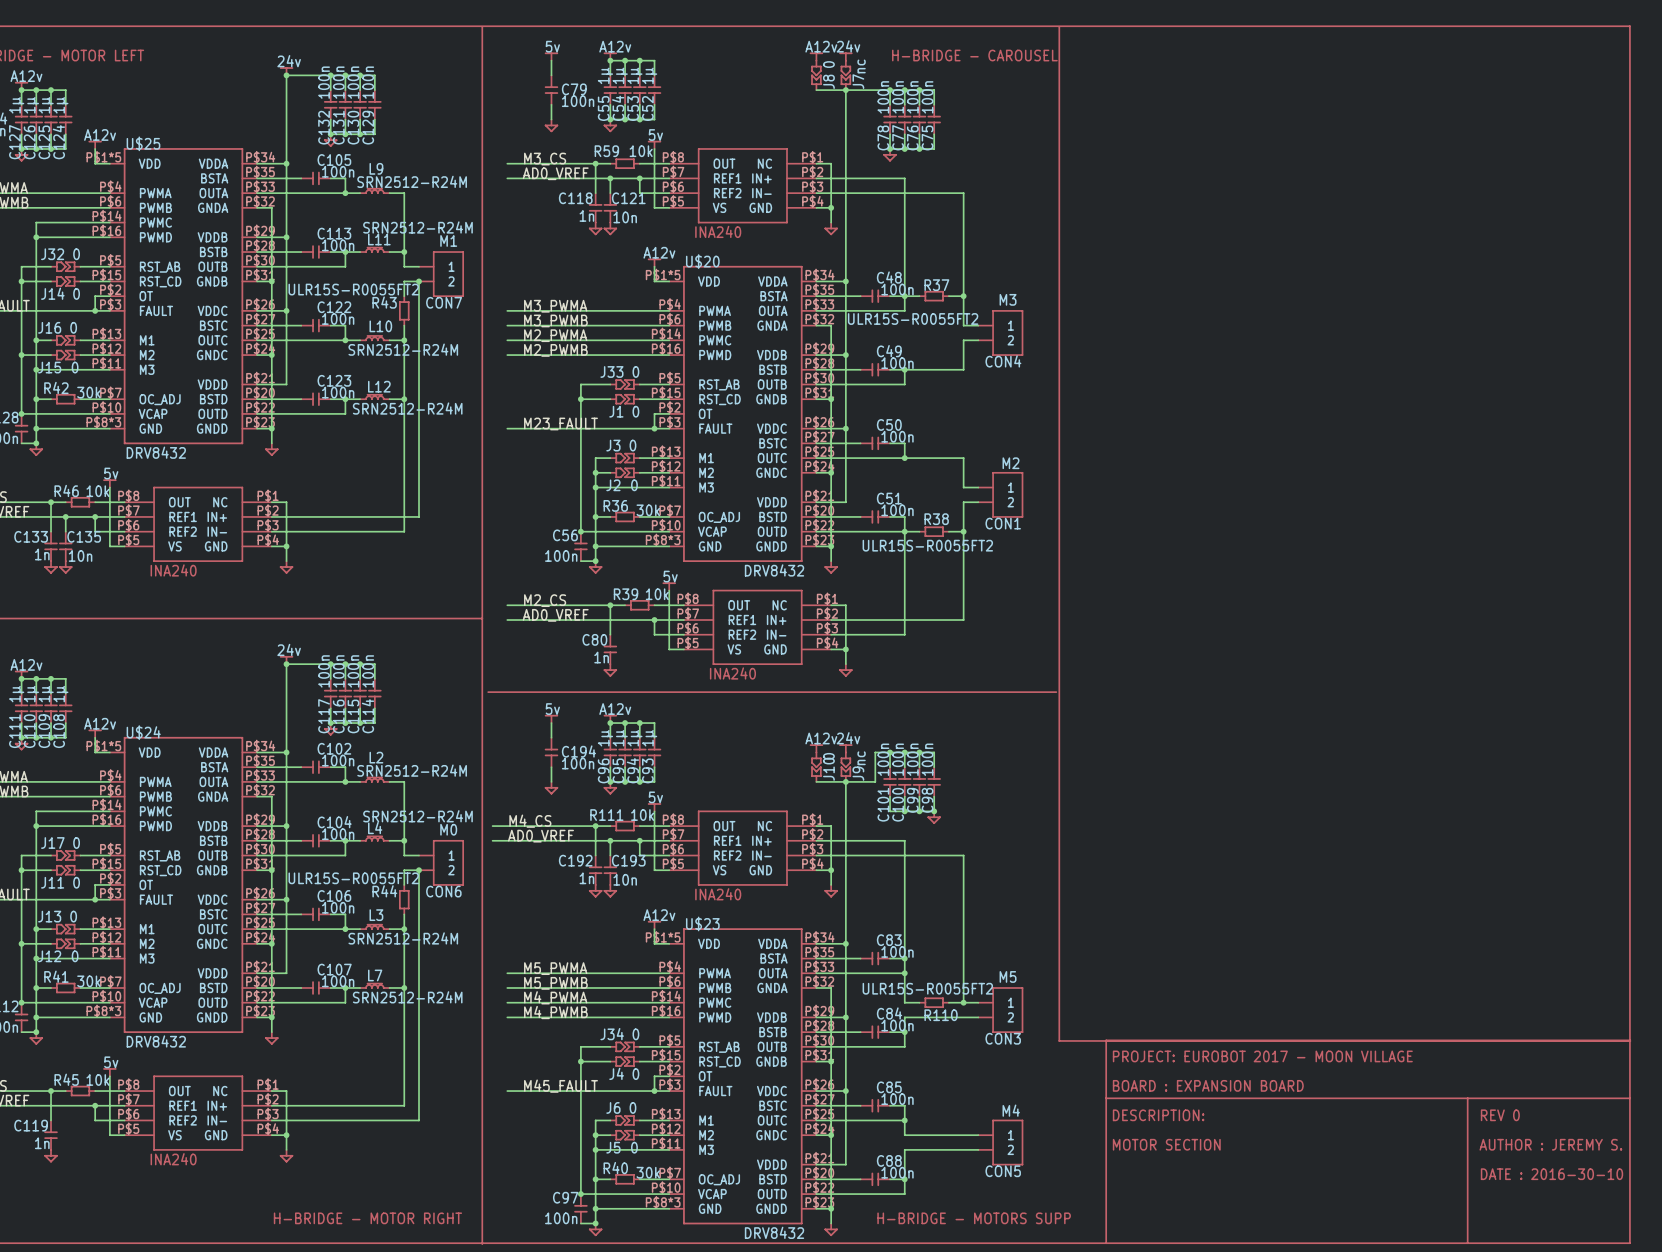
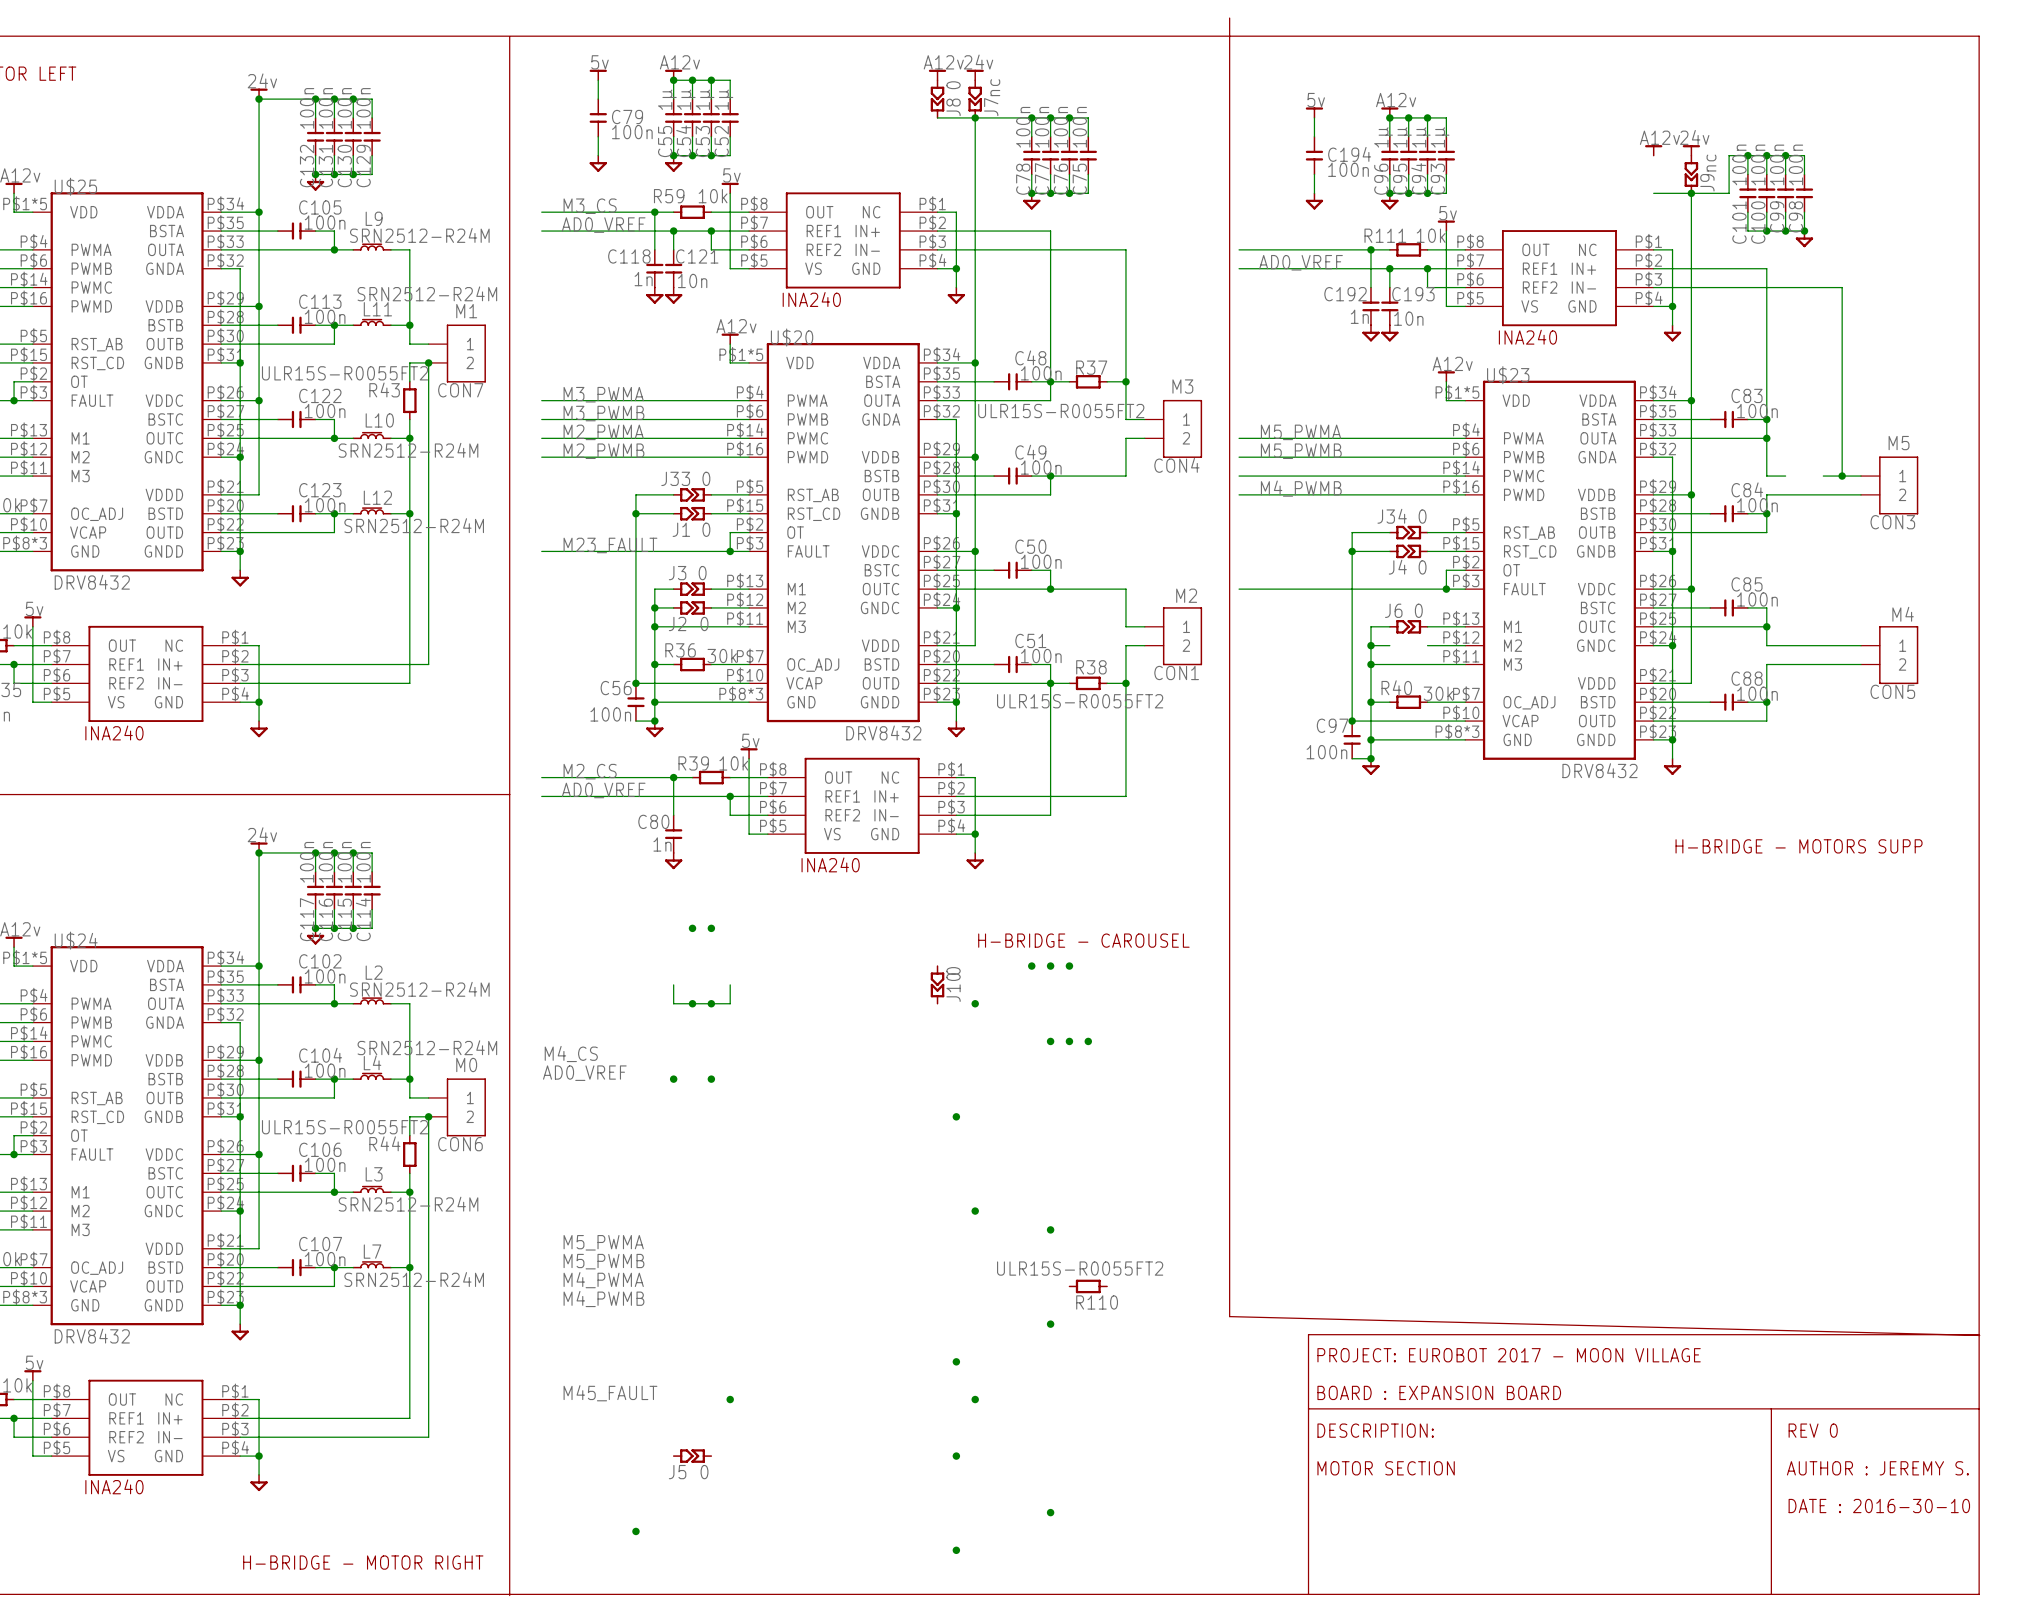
line: (1059, 26) (1059, 1040) (1630, 1040) -> (1229, 18) (1229, 1316) (1979, 1335)
text: H-BRIDGE - CAROUSEL (974, 55) -> none
power symbol: none -> (1314, 113)
power symbol: none -> (1389, 113)
wire: none -> (1314, 117) (1314, 136)
junction: none -> (1389, 117)
wire: none -> (1408, 117) (1408, 136)
junction: none -> (1408, 117)
wire: none -> (1427, 117) (1427, 136)
junction: none -> (1427, 117)
wire: none -> (1389, 136) (1389, 117) (1446, 117) (1446, 136)
power symbol: none -> (1653, 150)
power symbol: none -> (1691, 150)
wire: none -> (1747, 155) (1747, 174)
junction: none -> (1747, 155)
wire: none -> (1766, 155) (1766, 174)
junction: none -> (1766, 155)
wire: none -> (1785, 155) (1785, 174)
junction: none -> (1785, 155)
wire: none -> (1314, 174) (1314, 193)
wire: none -> (1389, 174) (1389, 193) (1446, 193) (1446, 174)
wire: none -> (1408, 174) (1408, 193)
wire: none -> (1427, 174) (1427, 193)
wire: none -> (1804, 174) (1804, 155) (1729, 155) (1729, 193) (1653, 193)
junction: none -> (1389, 193)
junction: none -> (1408, 193)
junction: none -> (1427, 193)
wire: none -> (1691, 193) (1691, 683) (1653, 683)
junction: none -> (1691, 193)
power symbol: none -> (1314, 201)
power symbol: none -> (1389, 201)
wire: none -> (1747, 212) (1747, 231) (1804, 231) (1804, 212)
wire: none -> (1766, 212) (1766, 231)
wire: none -> (1785, 212) (1785, 231)
power symbol: none -> (1446, 226)
wire: none -> (1446, 231) (1446, 306) (1465, 306)
junction: none -> (1766, 231)
junction: none -> (1785, 231)
junction: none -> (1804, 231)
power symbol: none -> (1804, 238)
wire: none -> (1239, 249) (1389, 249)
wire: none -> (1370, 249) (1370, 287)
junction: none -> (1370, 249)
wire: none -> (1427, 249) (1465, 249)
wire: none -> (1653, 249) (1672, 249) (1672, 325)
label: none -> AD0_VREF (1301, 262)
wire: none -> (1239, 268) (1465, 268)
wire: none -> (1389, 268) (1389, 287)
junction: none -> (1389, 268)
wire: none -> (1427, 268) (1427, 287) (1465, 287)
junction: none -> (1427, 268)
wire: none -> (1653, 268) (1766, 268) (1766, 476) (1785, 476)
part: none -> (1559, 278)
wire: none -> (1653, 287) (1842, 287) (1842, 476)
wire: none -> (1653, 306) (1672, 306)
junction: none -> (1672, 306)
power symbol: none -> (1370, 333)
power symbol: none -> (1389, 333)
power symbol: none -> (1672, 333)
power symbol: none -> (1446, 376)
wire: none -> (1446, 381) (1446, 400) (1465, 400)
wire: none -> (1653, 400) (1691, 400)
junction: none -> (1691, 400)
wire: none -> (1653, 419) (1710, 419)
wire: none -> (1747, 419) (1766, 419)
junction: none -> (1766, 419)
label: none -> M5_PWMA (1301, 432)
wire: none -> (1239, 438) (1465, 438)
wire: none -> (1653, 438) (1766, 438)
junction: none -> (1766, 438)
label: none -> M5_PWMB (1301, 451)
wire: none -> (1239, 457) (1465, 457)
wire: none -> (1653, 457) (1672, 457) (1672, 758)
wire: none -> (1239, 476) (1465, 476)
wire: none -> (1823, 476) (1861, 476)
junction: none -> (1842, 476)
label: none -> M4_PWMB (1301, 488)
wire: none -> (1239, 494) (1465, 494)
wire: none -> (1653, 494) (1691, 494)
junction: none -> (1691, 494)
wire: none -> (1861, 494) (1766, 494) (1766, 532) (1653, 532)
wire: none -> (1653, 513) (1710, 513)
wire: none -> (1747, 513) (1766, 513)
junction: none -> (1766, 513)
wire: none -> (1389, 532) (1352, 532) (1352, 721) (1465, 721)
wire: none -> (1427, 532) (1465, 532)
wire: none -> (1352, 551) (1389, 551)
junction: none -> (1352, 551)
wire: none -> (1427, 551) (1465, 551)
wire: none -> (1653, 551) (1672, 551)
junction: none -> (1672, 551)
wire: none -> (1465, 570) (1446, 570) (1446, 589)
wire: none -> (1239, 589) (1465, 589)
junction: none -> (1446, 589)
wire: none -> (1653, 589) (1691, 589)
junction: none -> (1691, 589)
wire: none -> (1653, 607) (1710, 607)
wire: none -> (1747, 607) (1766, 607) (1766, 645) (1861, 645)
wire: none -> (1389, 626) (1370, 626) (1370, 758) (1352, 758)
wire: none -> (1427, 626) (1465, 626)
wire: none -> (1653, 626) (1766, 626)
junction: none -> (1766, 626)
wire: none -> (1370, 645) (1389, 645)
junction: none -> (1370, 645)
wire: none -> (1427, 645) (1465, 645)
wire: none -> (1653, 645) (1672, 645)
junction: none -> (1672, 645)
wire: none -> (1370, 664) (1465, 664)
junction: none -> (1370, 664)
wire: none -> (1861, 664) (1766, 664) (1766, 721) (1653, 721)
wire: none -> (1370, 702) (1389, 702)
junction: none -> (1370, 702)
wire: none -> (1427, 702) (1465, 702)
wire: none -> (1653, 702) (1710, 702)
wire: none -> (1747, 702) (1766, 702)
junction: none -> (1766, 702)
junction: none -> (1352, 721)
wire: none -> (1370, 739) (1465, 739)
junction: none -> (1370, 739)
wire: none -> (1653, 739) (1672, 739)
junction: none -> (1672, 739)
junction: none -> (1370, 758)
power symbol: none -> (1370, 766)
power symbol: none -> (1672, 766)
text: none -> H-BRIDGE - MOTORS SUPP (1799, 846)
line: (488, 692) (1056, 692) -> none
power symbol: (551, 719) -> none
power symbol: (610, 719) -> none
wire: (551, 723) (551, 737) -> none
junction: (610, 723) -> none
wire: (625, 723) (625, 737) -> none
wire: (639, 723) (639, 737) -> none
text: none -> H-BRIDGE - CAROUSEL (1083, 940)
wire: (610, 737) (610, 723) (654, 723) (654, 737) -> none
power symbol: (816, 748) -> none
power symbol: (845, 748) -> none
C194 position: (551, 752) -> (1314, 155)
C96 position: (610, 752) -> (1389, 155)
C95 position: (625, 752) -> (1408, 155)
C94 position: (639, 752) -> (1427, 155)
C93 position: (654, 752) -> (1446, 155)
wire: (890, 752) (890, 767) -> none
wire: (904, 752) (904, 767) -> none
wire: (919, 752) (919, 767) -> none
wire: (551, 767) (551, 781) -> none
wire: (625, 767) (625, 781) -> none
wire: (639, 767) (639, 781) -> none
J9 position: (845, 767) -> (1691, 174)
wire: (934, 767) (934, 752) (875, 752) (875, 781) (816, 781) -> none
junction: (610, 781) -> none
wire: (845, 781) (845, 1164) (816, 1164) -> none
C101 position: (890, 781) -> (1747, 193)
C100 position: (904, 781) -> (1766, 193)
C99 position: (919, 781) -> (1785, 193)
C98 position: (934, 781) -> (1804, 193)
power symbol: (551, 787) -> none
power symbol: (610, 787) -> none
wire: (890, 796) (890, 811) (934, 811) (934, 796) -> none
wire: (904, 796) (904, 811) -> none
wire: (919, 796) (919, 811) -> none
power symbol: (654, 807) -> none
wire: (654, 811) (654, 870) (669, 870) -> none
power symbol: (934, 817) -> none
wire: (492, 826) (610, 826) -> none
wire: (595, 826) (595, 855) -> none
junction: (595, 826) -> none
R111 position: (625, 826) -> (1408, 249)
wire: (639, 826) (669, 826) -> none
wire: (816, 826) (831, 826) (831, 884) -> none
wire: (492, 840) (669, 840) -> none
wire: (610, 840) (610, 855) -> none
wire: (639, 840) (639, 855) (669, 855) -> none
wire: (816, 840) (904, 840) (904, 1002) (919, 1002) -> none
part: (742, 848) -> none
wire: (816, 855) (963, 855) (963, 1002) -> none
C192 position: (595, 870) -> (1370, 306)
C193 position: (610, 870) -> (1389, 306)
wire: (816, 870) (831, 870) -> none
power symbol: (595, 890) -> none
power symbol: (610, 890) -> none
power symbol: (831, 890) -> none
power symbol: (654, 925) -> none
wire: (654, 929) (654, 943) (669, 943) -> none
wire: (816, 943) (845, 943) -> none
wire: (816, 958) (860, 958) -> none
C83 position: (875, 958) -> (1729, 419)
wire: (890, 958) (904, 958) -> none
wire: (507, 973) (669, 973) -> none
wire: (816, 973) (904, 973) -> none
junction: (904, 973) -> none
wire: (507, 987) (669, 987) -> none
wire: (816, 987) (831, 987) (831, 1223) -> none
wire: (507, 1002) (669, 1002) -> none
wire: (948, 1002) (978, 1002) -> none
junction: (963, 1002) -> none
CON3 position: (1000, 1010) -> (1889, 485)
wire: (507, 1017) (669, 1017) -> none
wire: (816, 1017) (845, 1017) -> none
junction: (845, 1017) -> none
wire: (978, 1017) (904, 1017) (904, 1046) (816, 1046) -> none
wire: (816, 1032) (860, 1032) -> none
C84 position: (875, 1032) -> (1729, 513)
wire: (890, 1032) (904, 1032) -> none
wire: (610, 1046) (580, 1046) (580, 1194) (669, 1194) -> none
J34 position: (625, 1046) -> (1408, 532)
wire: (639, 1046) (669, 1046) -> none
wire: (580, 1061) (610, 1061) -> none
junction: (580, 1061) -> none
J4 position: (625, 1061) -> (1408, 551)
wire: (639, 1061) (669, 1061) -> none
wire: (816, 1061) (831, 1061) -> none
wire: (669, 1076) (654, 1076) (654, 1091) -> none
U$23 position: (742, 1076) -> (1559, 570)
wire: (507, 1091) (669, 1091) -> none
wire: (816, 1091) (845, 1091) -> none
wire: (816, 1105) (860, 1105) -> none
C85 position: (875, 1105) -> (1729, 607)
wire: (890, 1105) (904, 1105) (904, 1135) (978, 1135) -> none
wire: (610, 1120) (595, 1120) (595, 1223) (580, 1223) -> none
J6 position: (625, 1120) -> (1408, 626)
wire: (639, 1120) (669, 1120) -> none
wire: (816, 1120) (904, 1120) -> none
junction: (904, 1120) -> none
wire: (595, 1135) (610, 1135) -> none
junction: (595, 1135) -> none
wire: (639, 1135) (669, 1135) -> none
wire: (816, 1135) (831, 1135) -> none
CON5 position: (1000, 1142) -> (1889, 655)
wire: (595, 1149) (669, 1149) -> none
junction: (595, 1149) -> none
wire: (978, 1149) (904, 1149) (904, 1194) (816, 1194) -> none
wire: (595, 1179) (610, 1179) -> none
junction: (595, 1179) -> none
R40 position: (625, 1179) -> (1408, 702)
wire: (639, 1179) (669, 1179) -> none
wire: (816, 1179) (860, 1179) -> none
C88 position: (875, 1179) -> (1729, 702)
wire: (890, 1179) (904, 1179) -> none
C97 position: (580, 1208) -> (1352, 739)
wire: (595, 1208) (669, 1208) -> none
junction: (595, 1208) -> none
wire: (816, 1208) (831, 1208) -> none
text: H-BRIDGE - MOTORS SUPP (974, 1218) -> none
junction: (595, 1223) -> none
power symbol: (595, 1229) -> none
power symbol: (831, 1229) -> none

